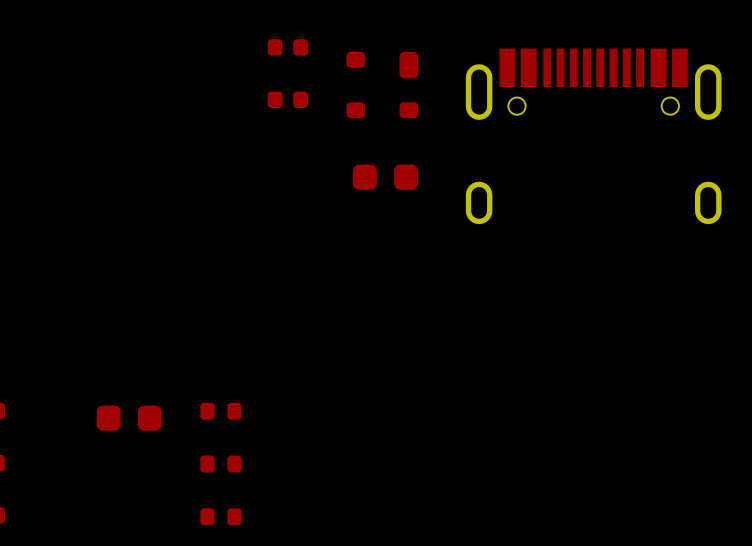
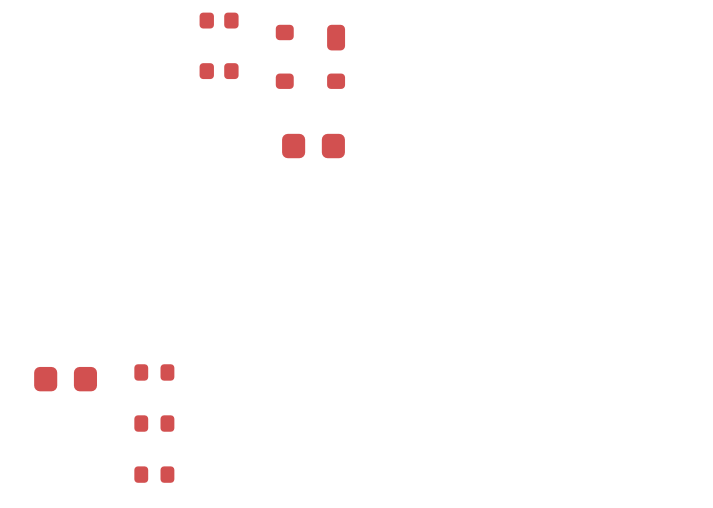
part: (593, 136) -> none

